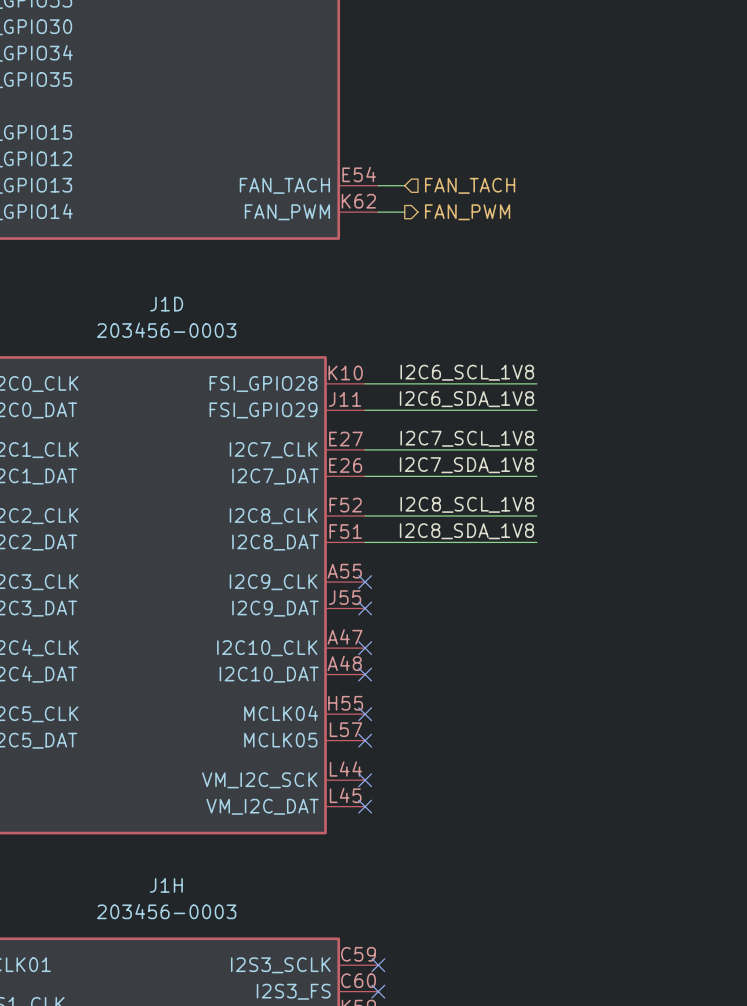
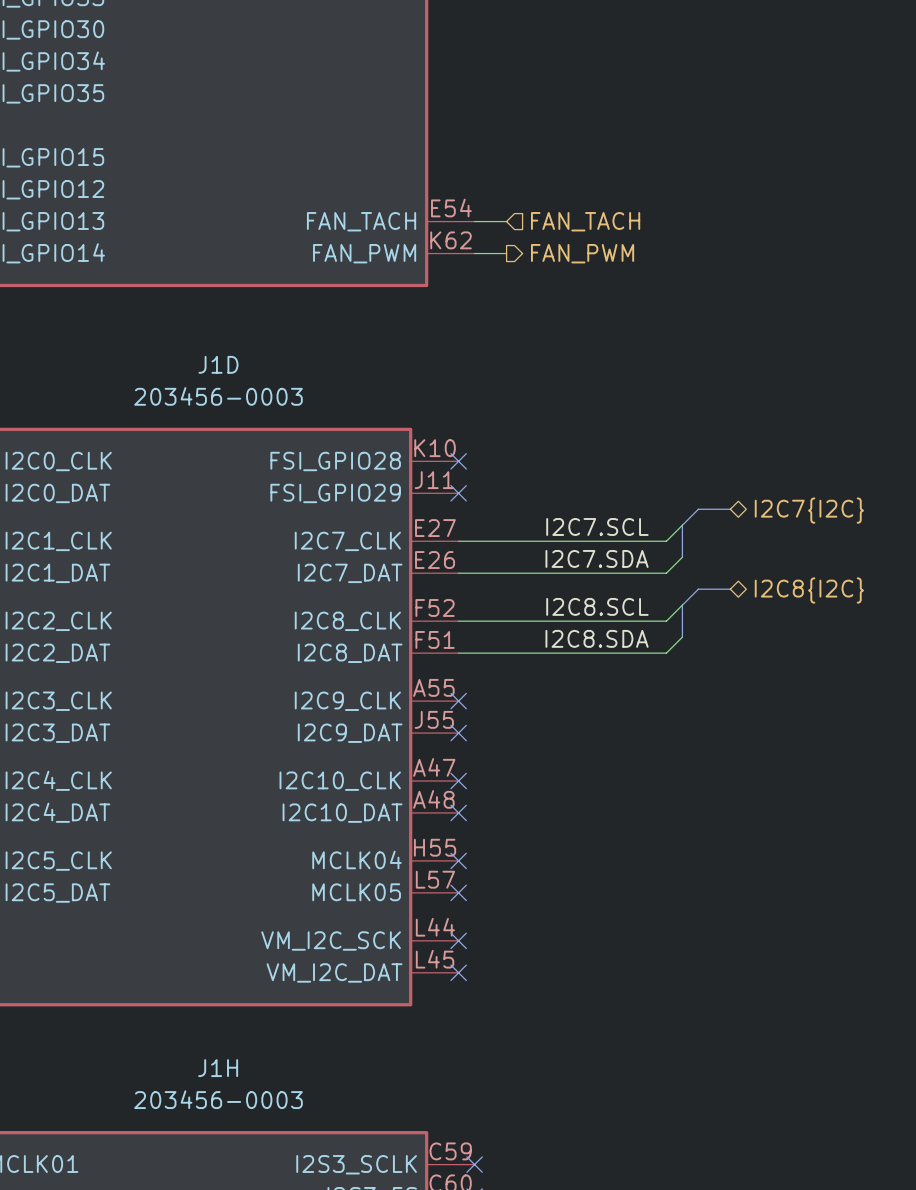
label: I2C6_SCL_1V8 (467, 372) -> none
wire: (365, 383) (536, 383) -> none
no-connect mark: none -> (458, 461)
label: I2C6_SDA_1V8 (466, 399) -> none
wire: (365, 410) (536, 410) -> none
no-connect mark: none -> (458, 493)
bus: none -> (730, 509) (698, 509) (682, 525) (682, 557)
hierarchical label: none -> I2C7{I2C} (809, 510)
wire: none -> (682, 525) (666, 541)
label: I2C7_SCL_1V8 (467, 438) -> I2C7.SCL (597, 526)
wire: none -> (682, 557) (666, 573)
label: I2C7_SDA_1V8 (466, 465) -> I2C7.SDA (597, 558)
bus: none -> (730, 589) (698, 589) (682, 605) (682, 637)
hierarchical label: none -> I2C8{I2C} (809, 590)
wire: none -> (682, 605) (666, 621)
label: I2C8_SCL_1V8 (467, 504) -> I2C8.SCL (597, 606)
wire: none -> (682, 637) (666, 653)
label: I2C8_SDA_1V8 (466, 531) -> I2C8.SDA (597, 638)

